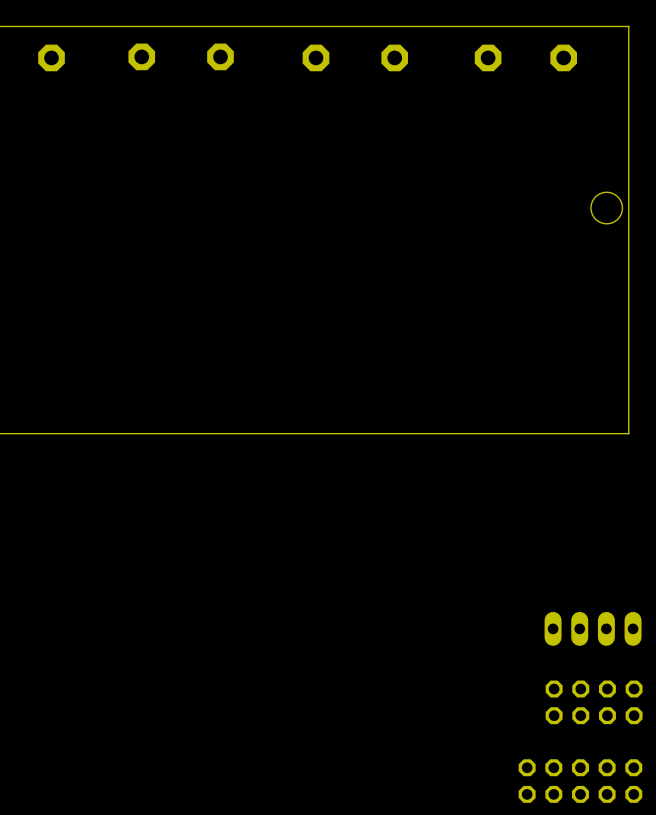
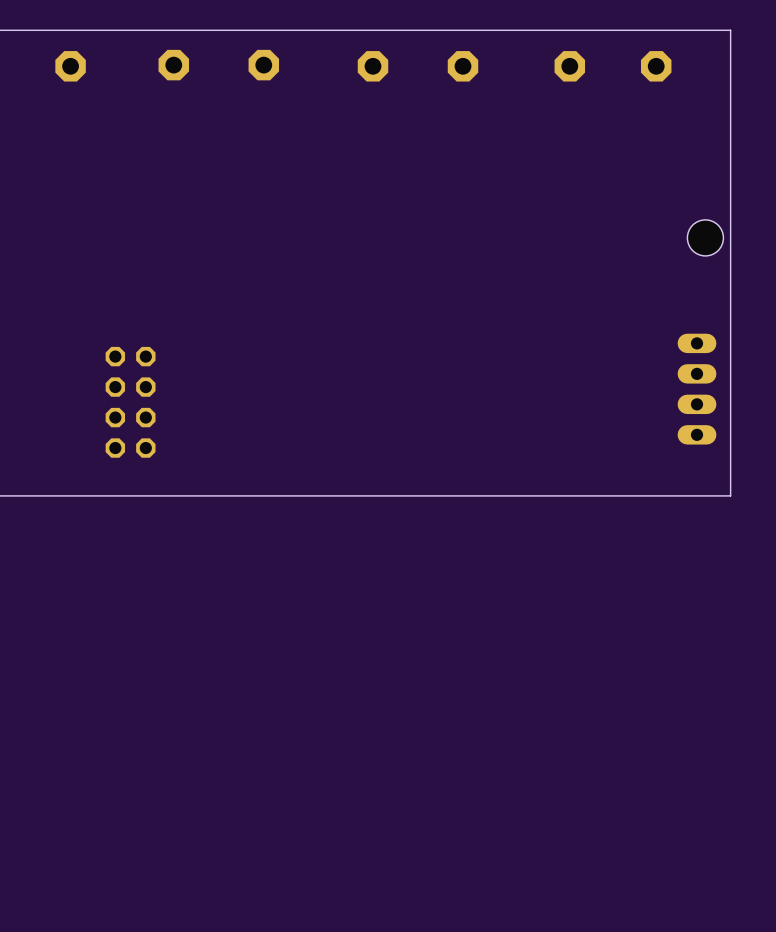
part: none -> (697, 389)
part: none -> (130, 402)
part: (593, 628) -> none
part: (594, 702) -> none
part: (580, 781) -> none

